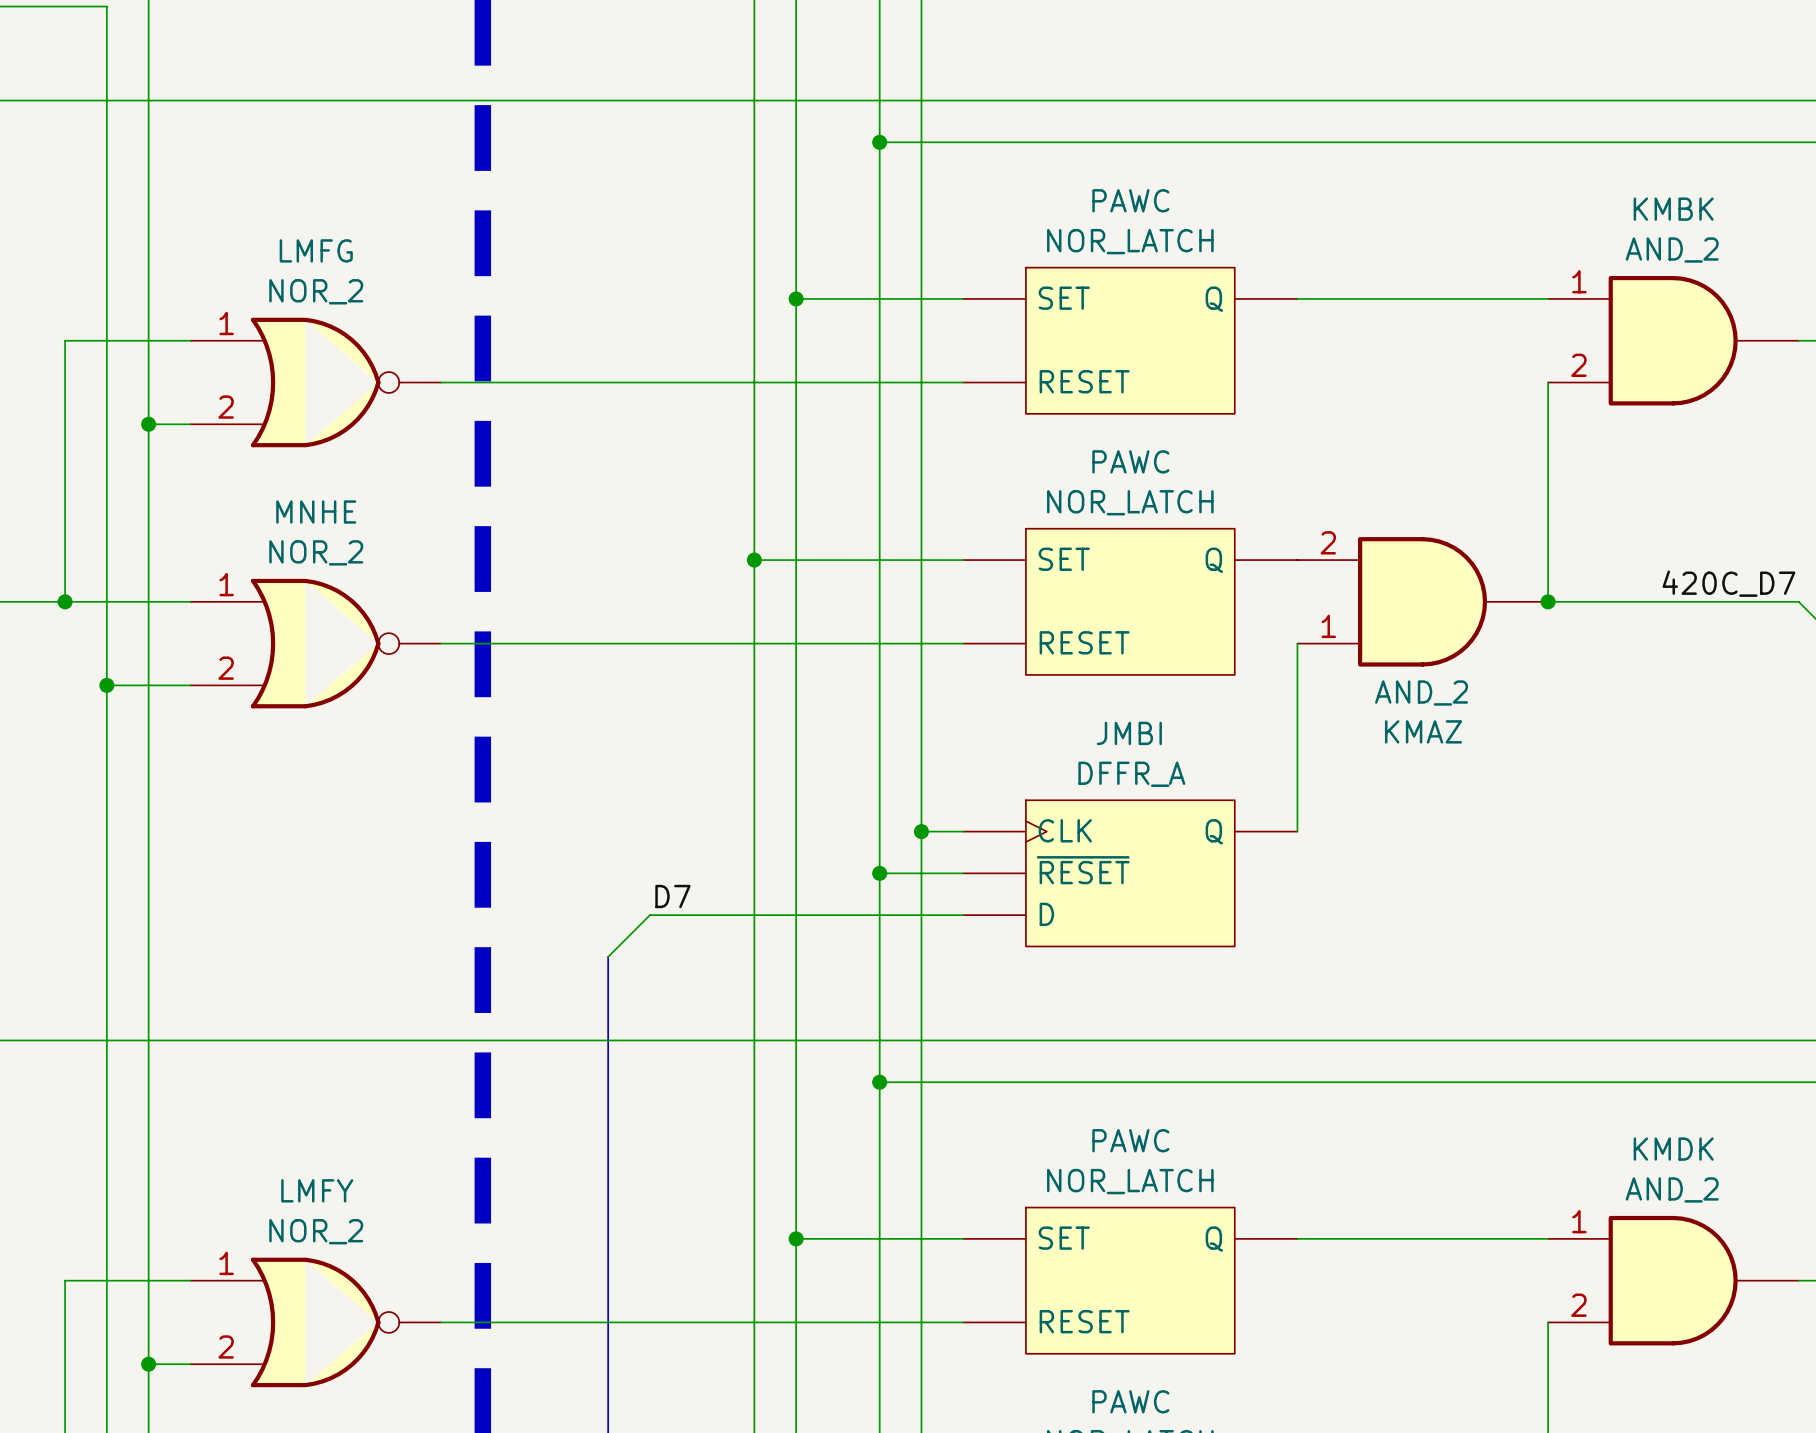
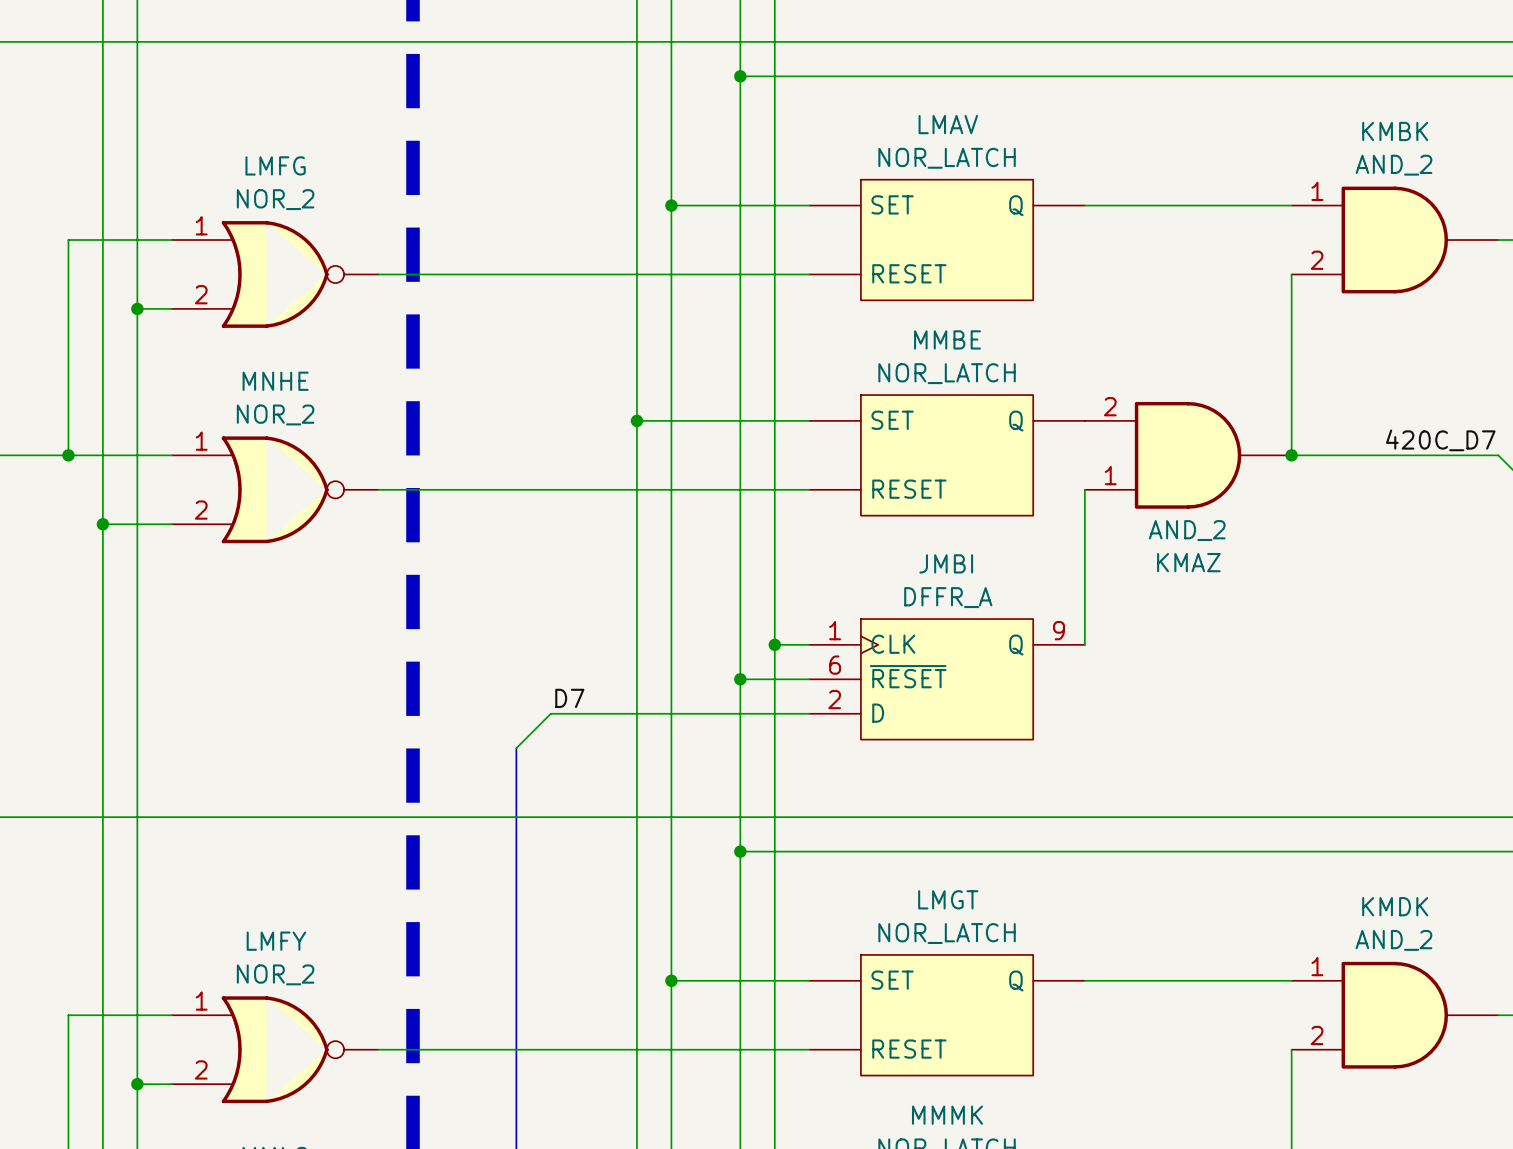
PAWC name: PAWC (1130, 200) -> LMAV (948, 124)
PAWC name: PAWC (1130, 461) -> MMBE (947, 339)
JMBI pin number: none -> 1 (835, 630)
JMBI pin number: none -> 9 (1059, 630)
JMBI pin number: none -> 6 (835, 665)
JMBI pin number: none -> 2 (834, 699)
PAWC name: PAWC (1130, 1140) -> LMGT (948, 899)
PAWC name: PAWC (1130, 1401) -> MMMK (947, 1115)

